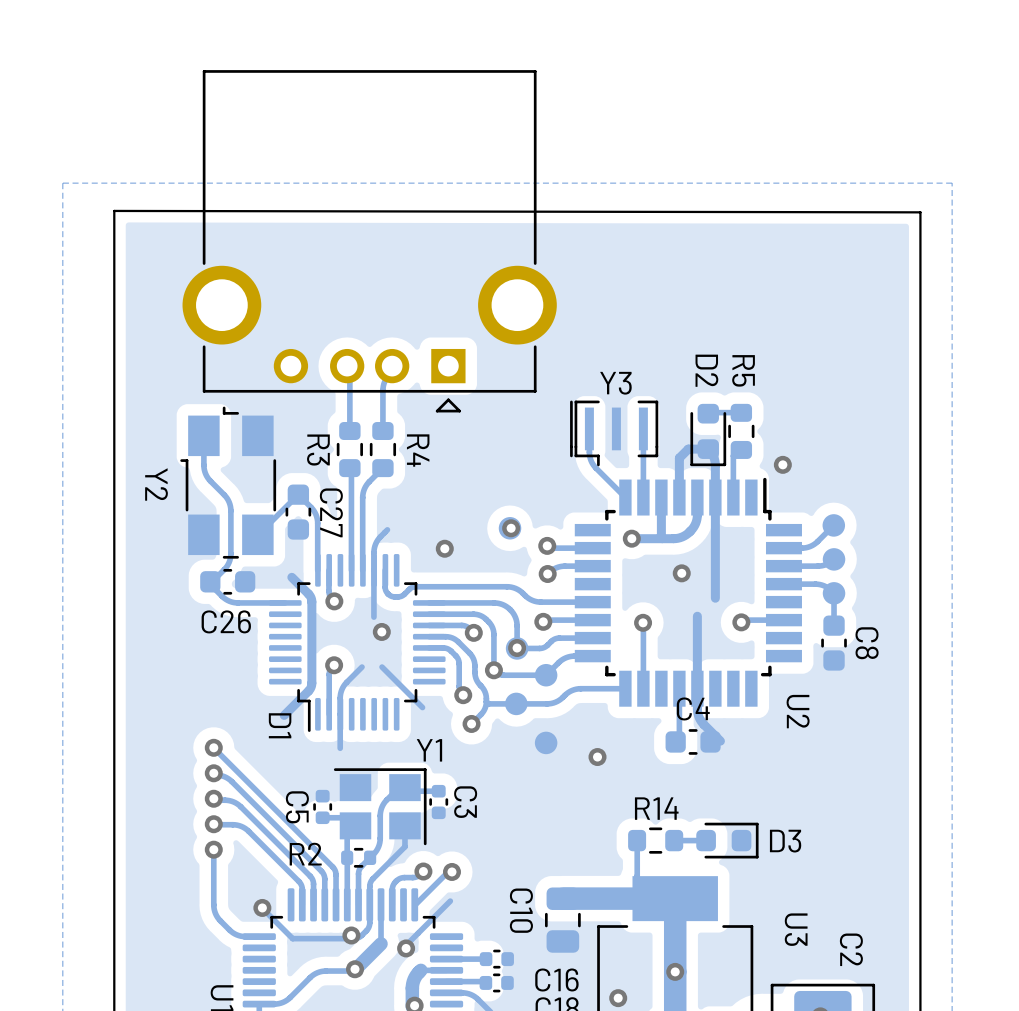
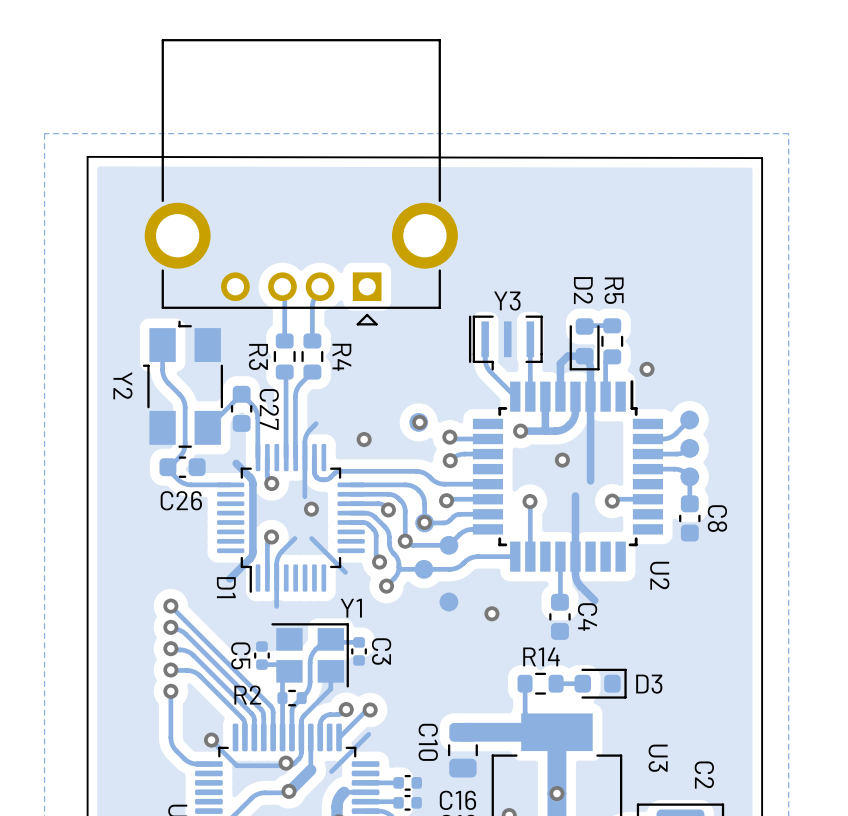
C4 rotation: 0° (693, 741) -> 90° clockwise (559, 616)
via: (406, 948) -> none

